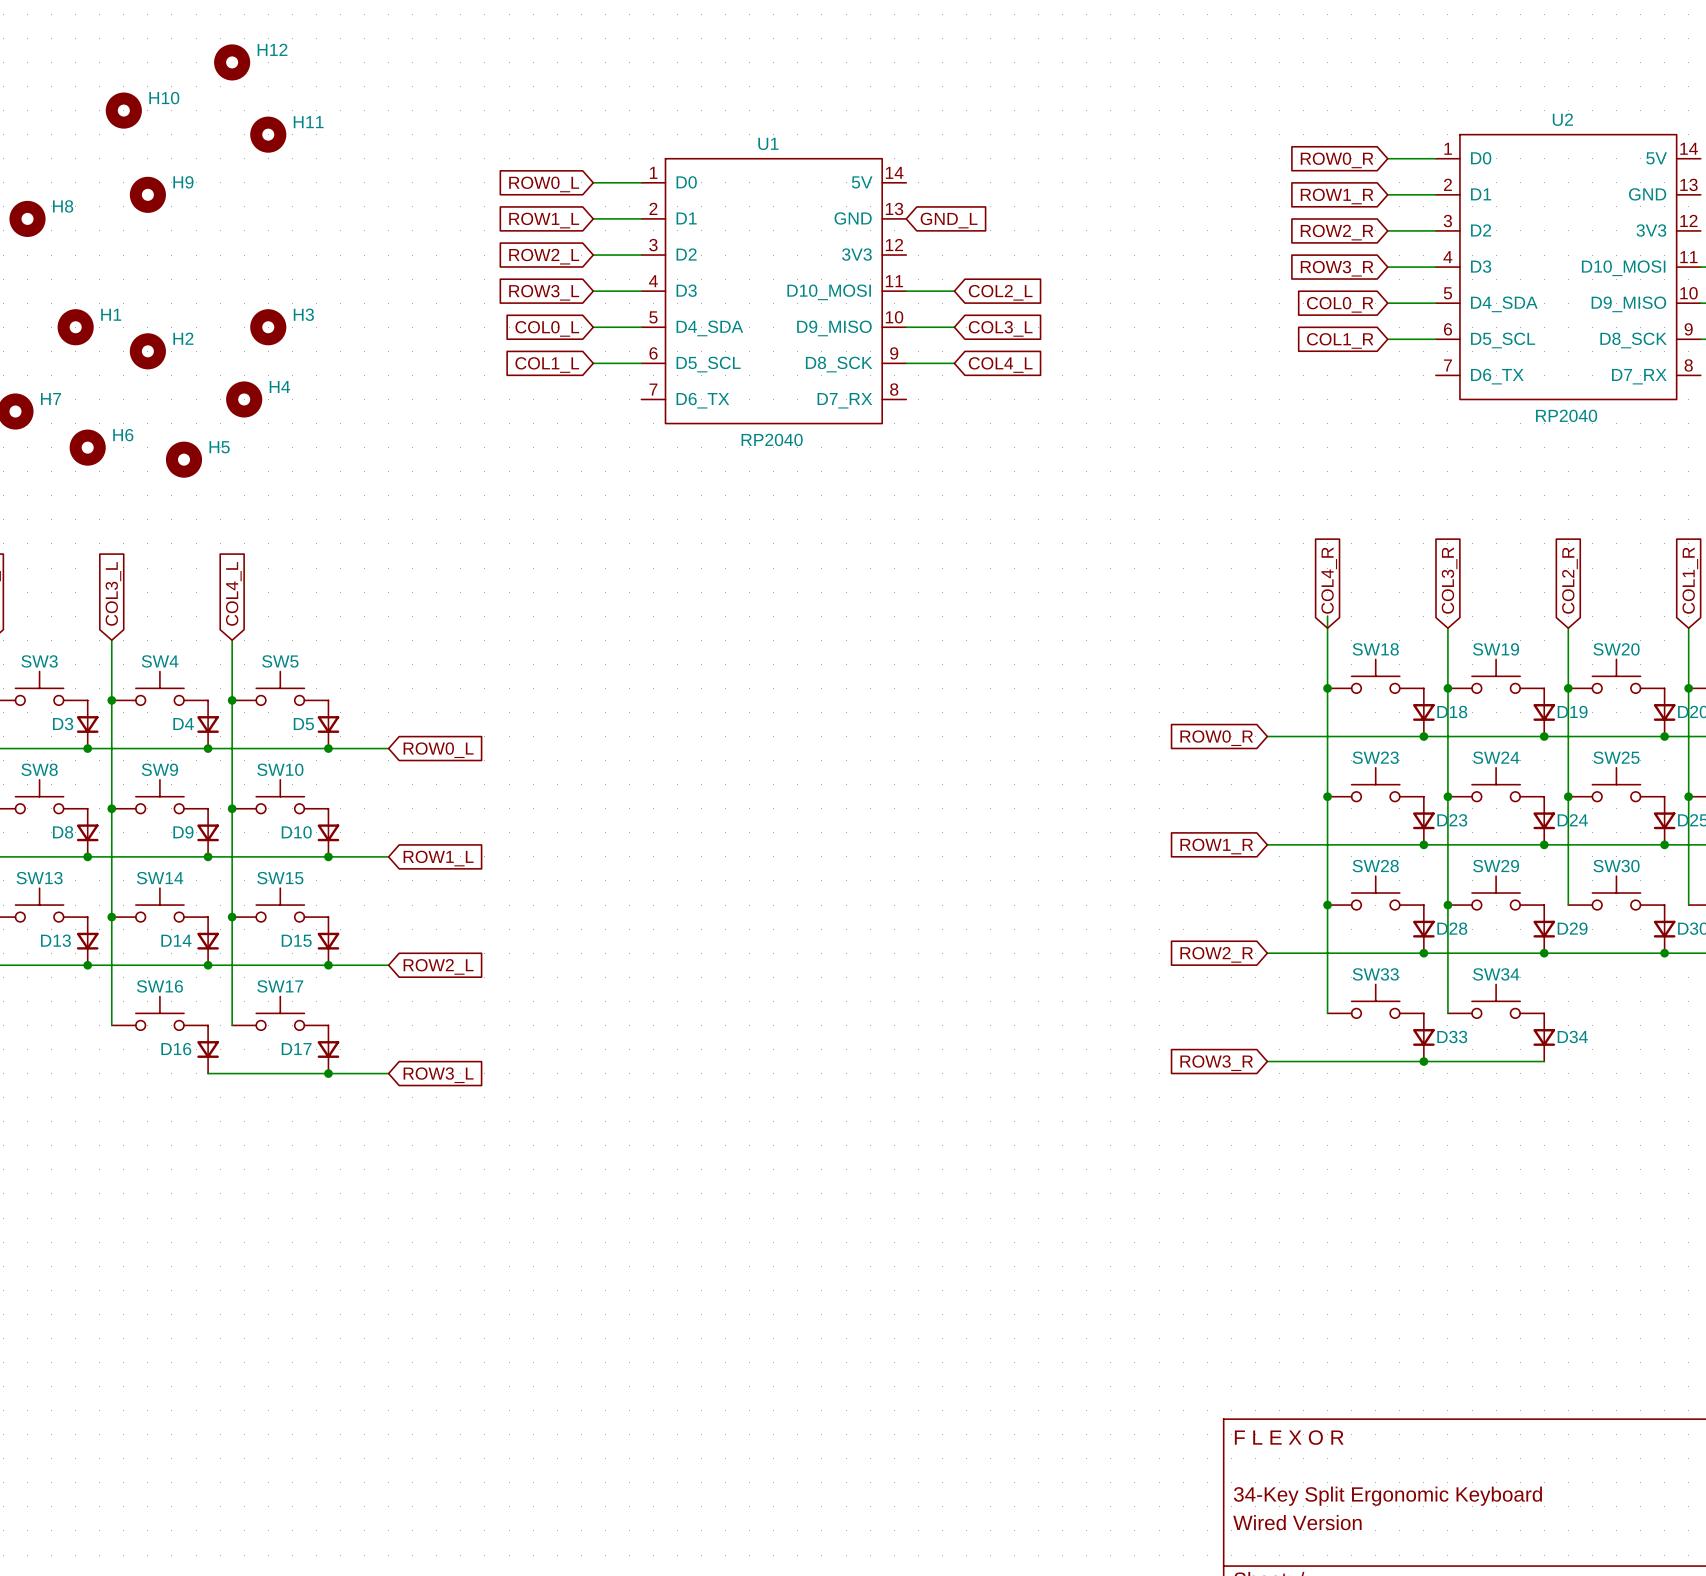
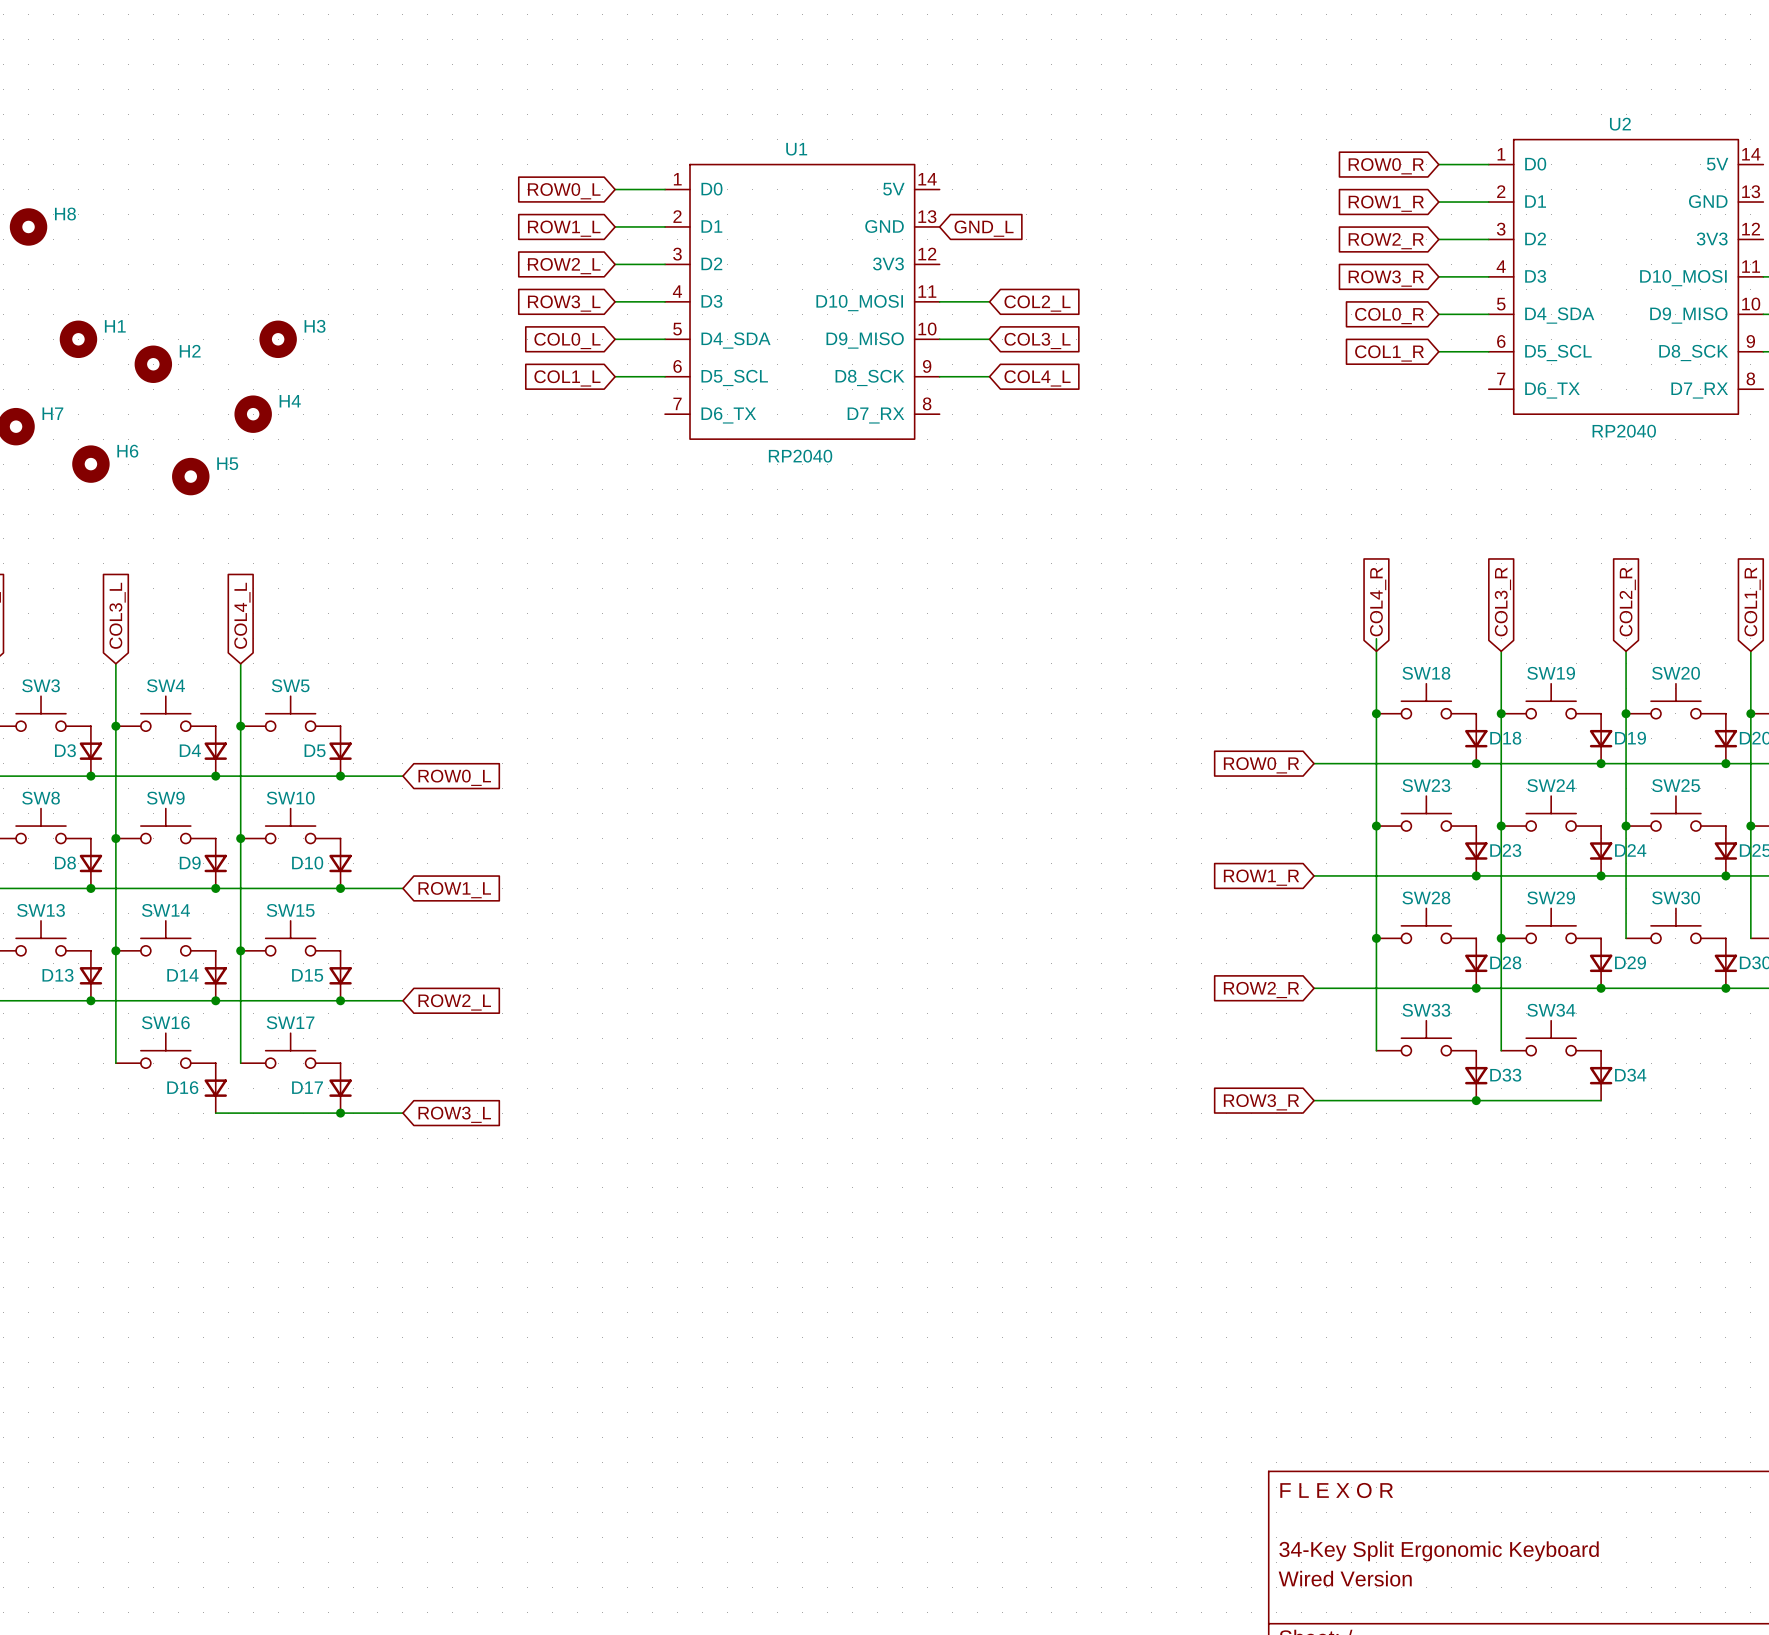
H12: (232, 62) -> none
H10: (123, 110) -> none
H11: (268, 134) -> none
H9: (147, 194) -> none

